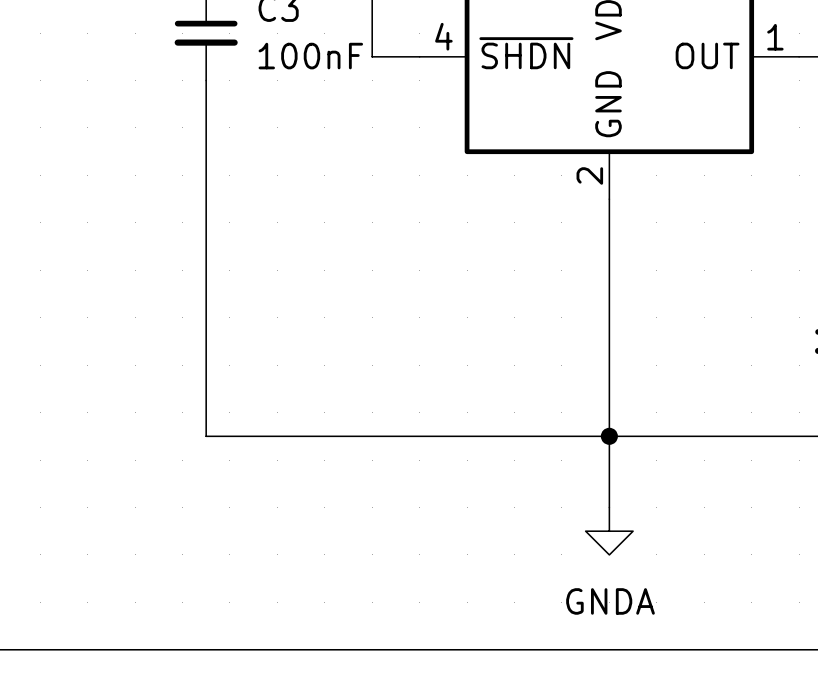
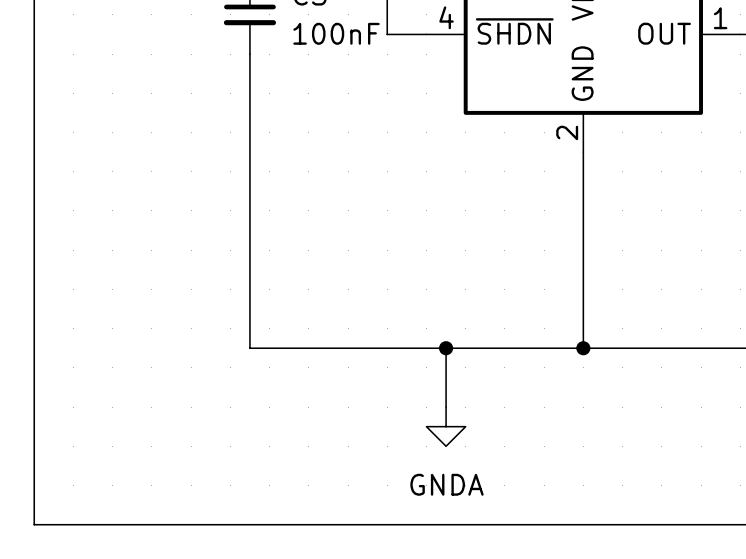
junction: none -> (446, 348)
wire: (609, 436) (609, 507) -> (446, 348) (446, 407)
power symbol position: GNDA (609, 531) -> GNDA (446, 426)

